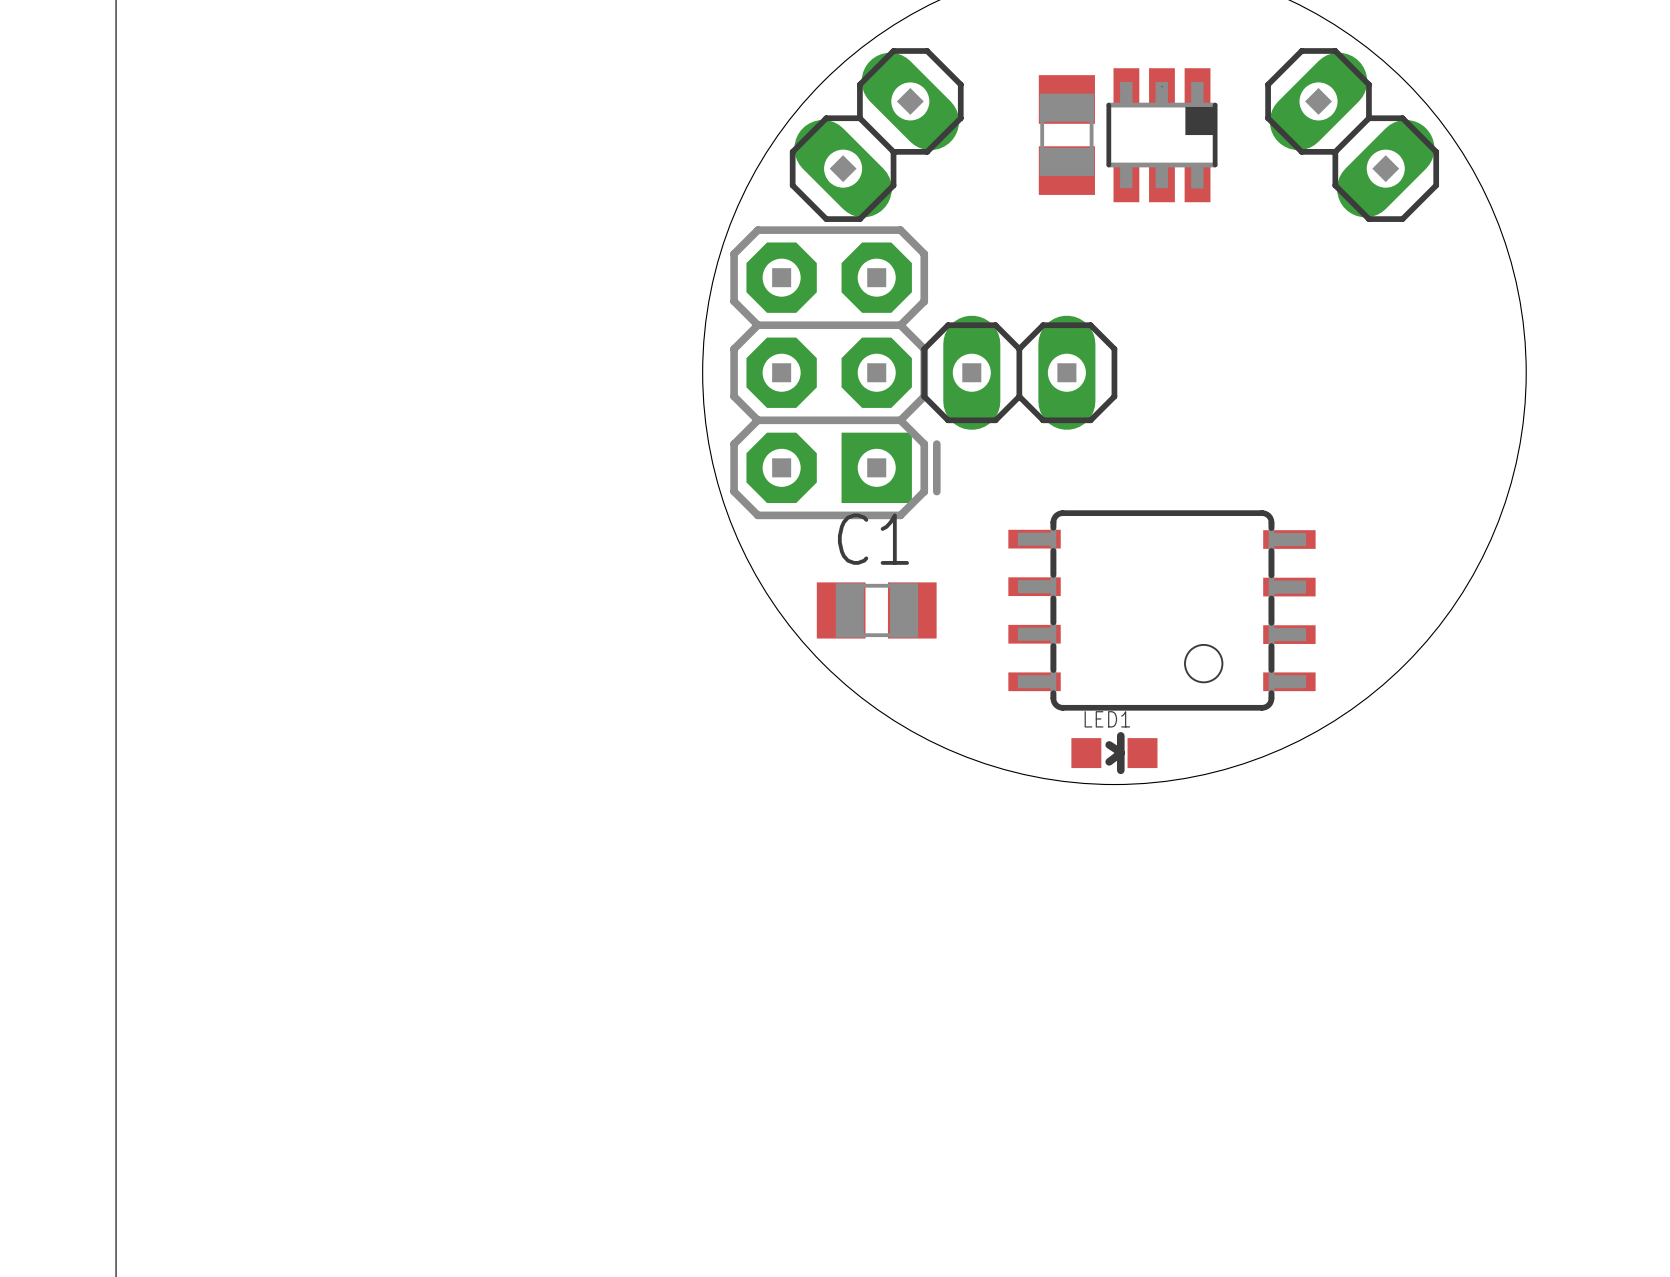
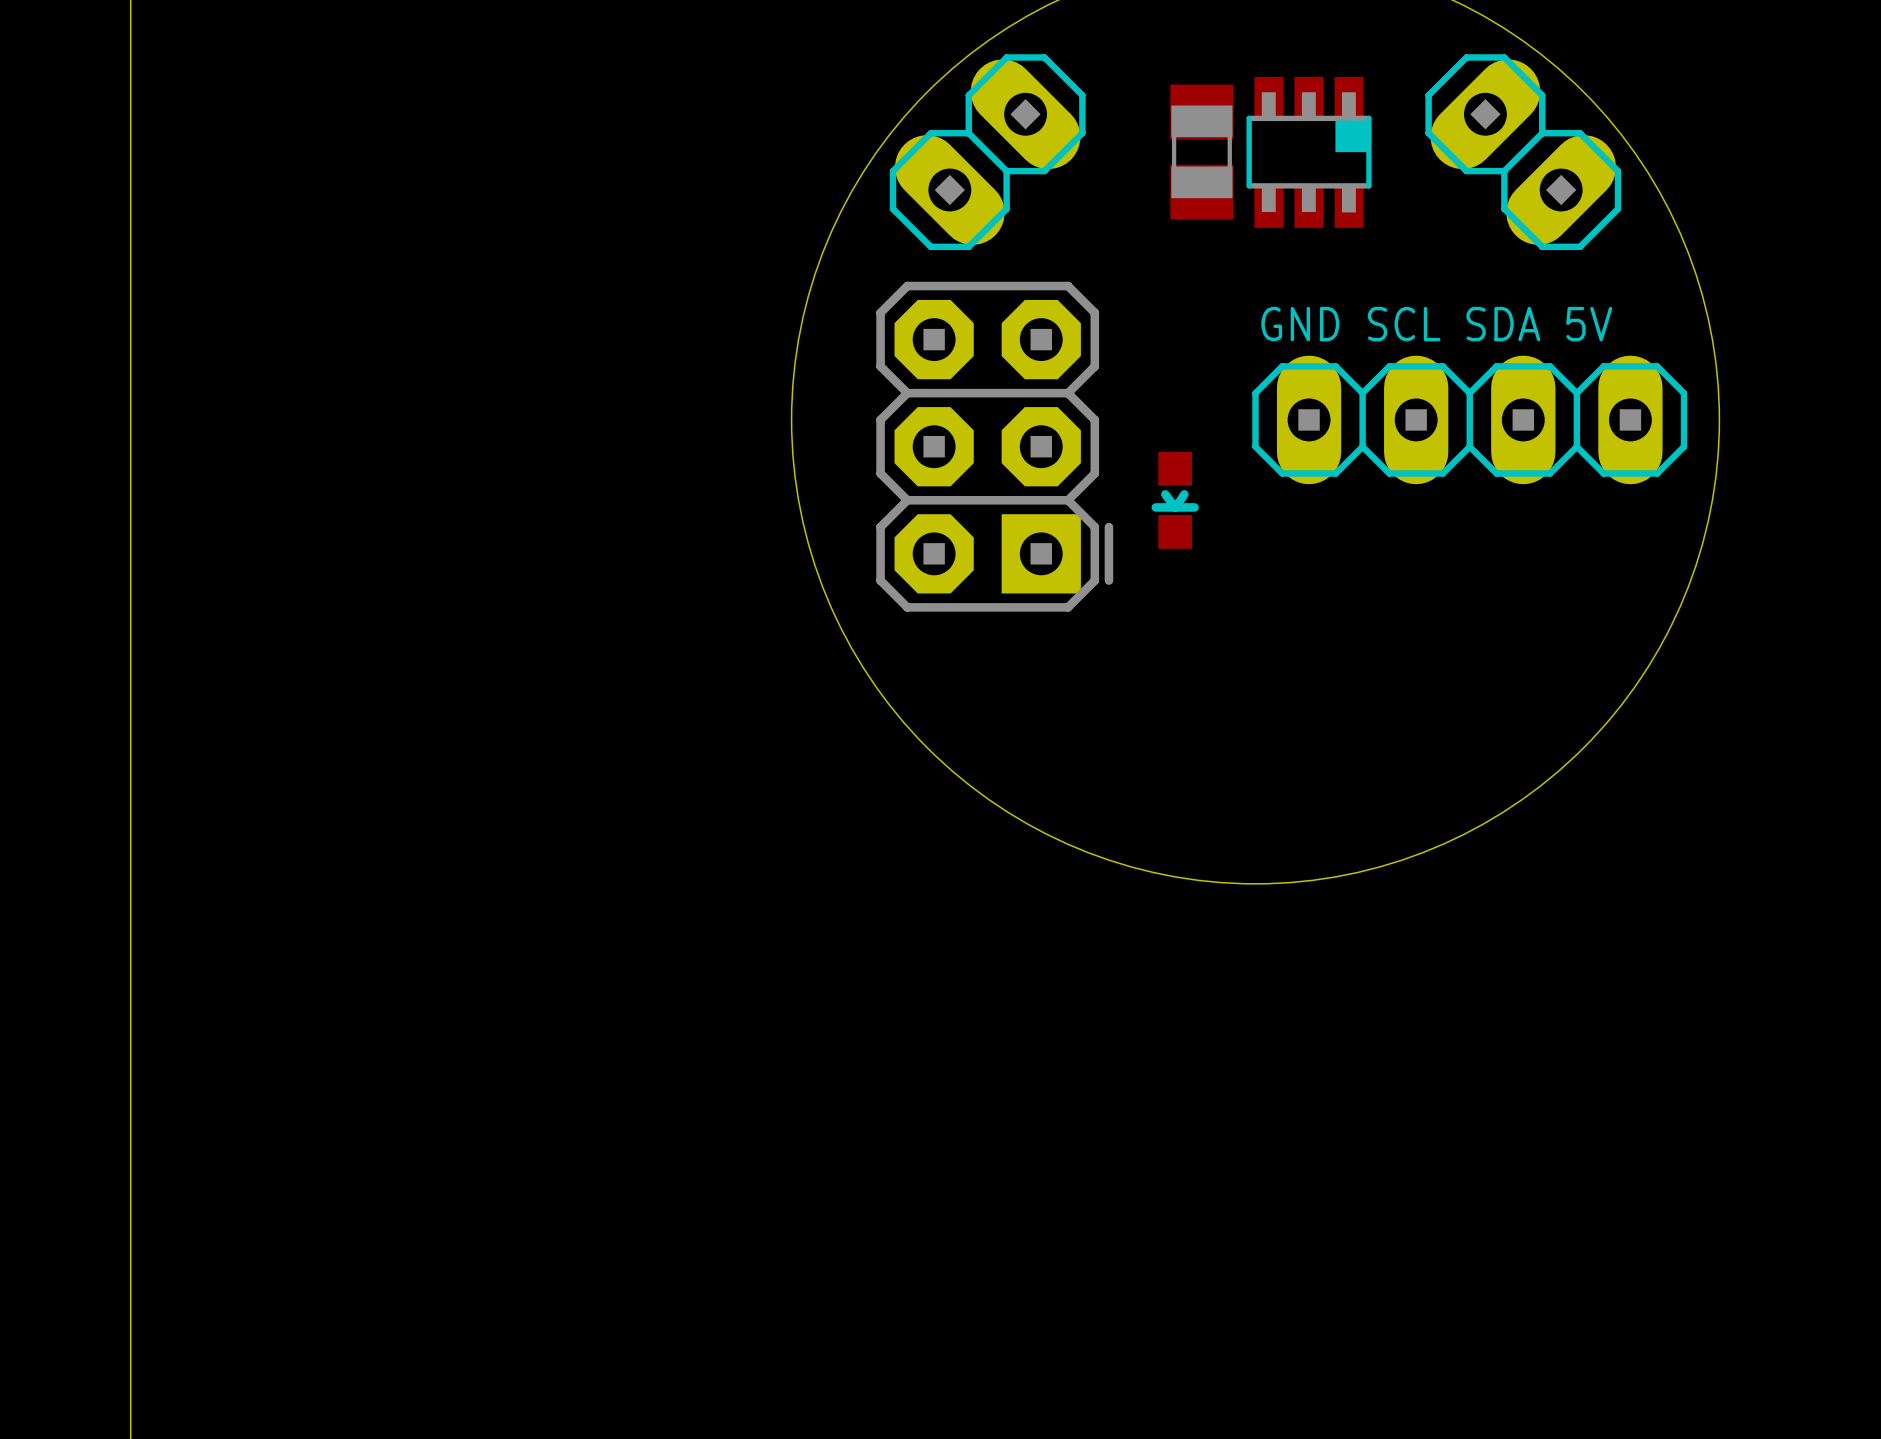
text: none -> GND SCL SDA 5V (1436, 324)
part position: (835, 372) -> (994, 446)
part: (1019, 372) -> none
part: none -> (1469, 419)
part: none -> (1175, 500)
C1: (876, 610) -> none
part: (1161, 610) -> none
LED1: (1114, 753) -> none

